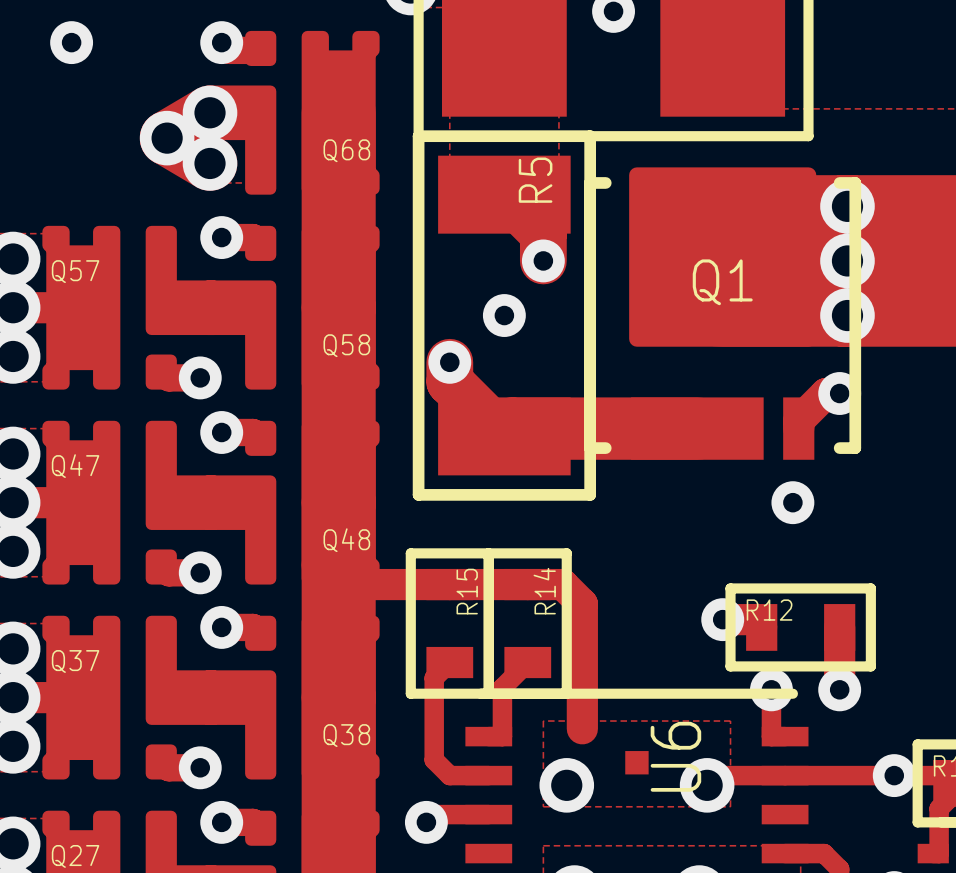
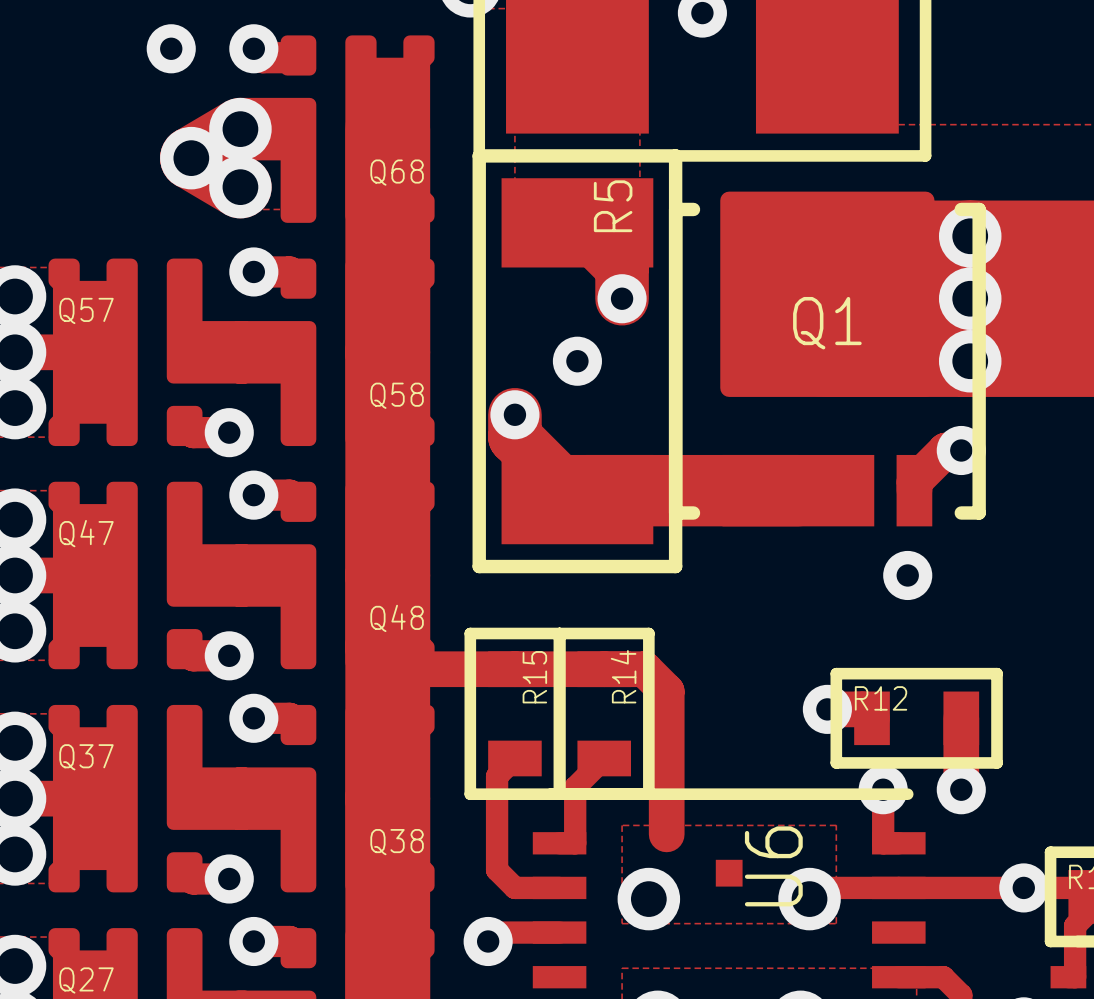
via position: (71, 42) -> (171, 48)

